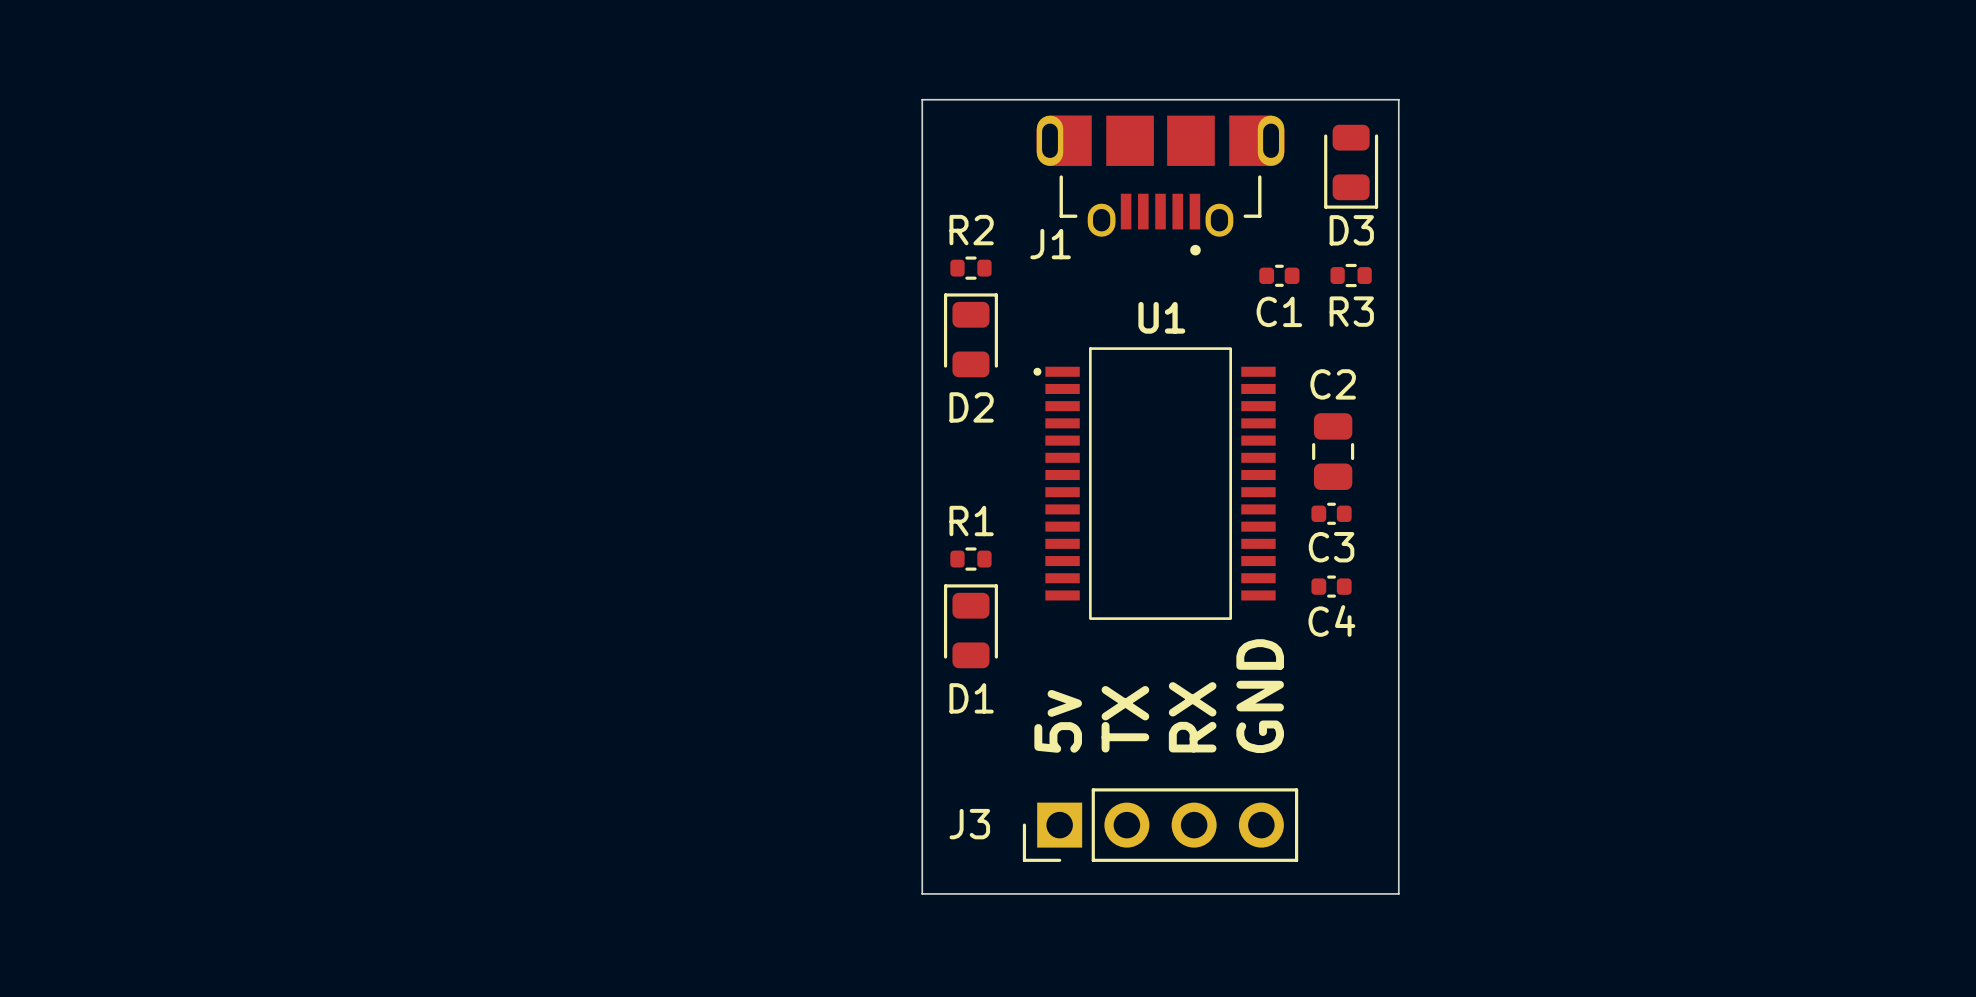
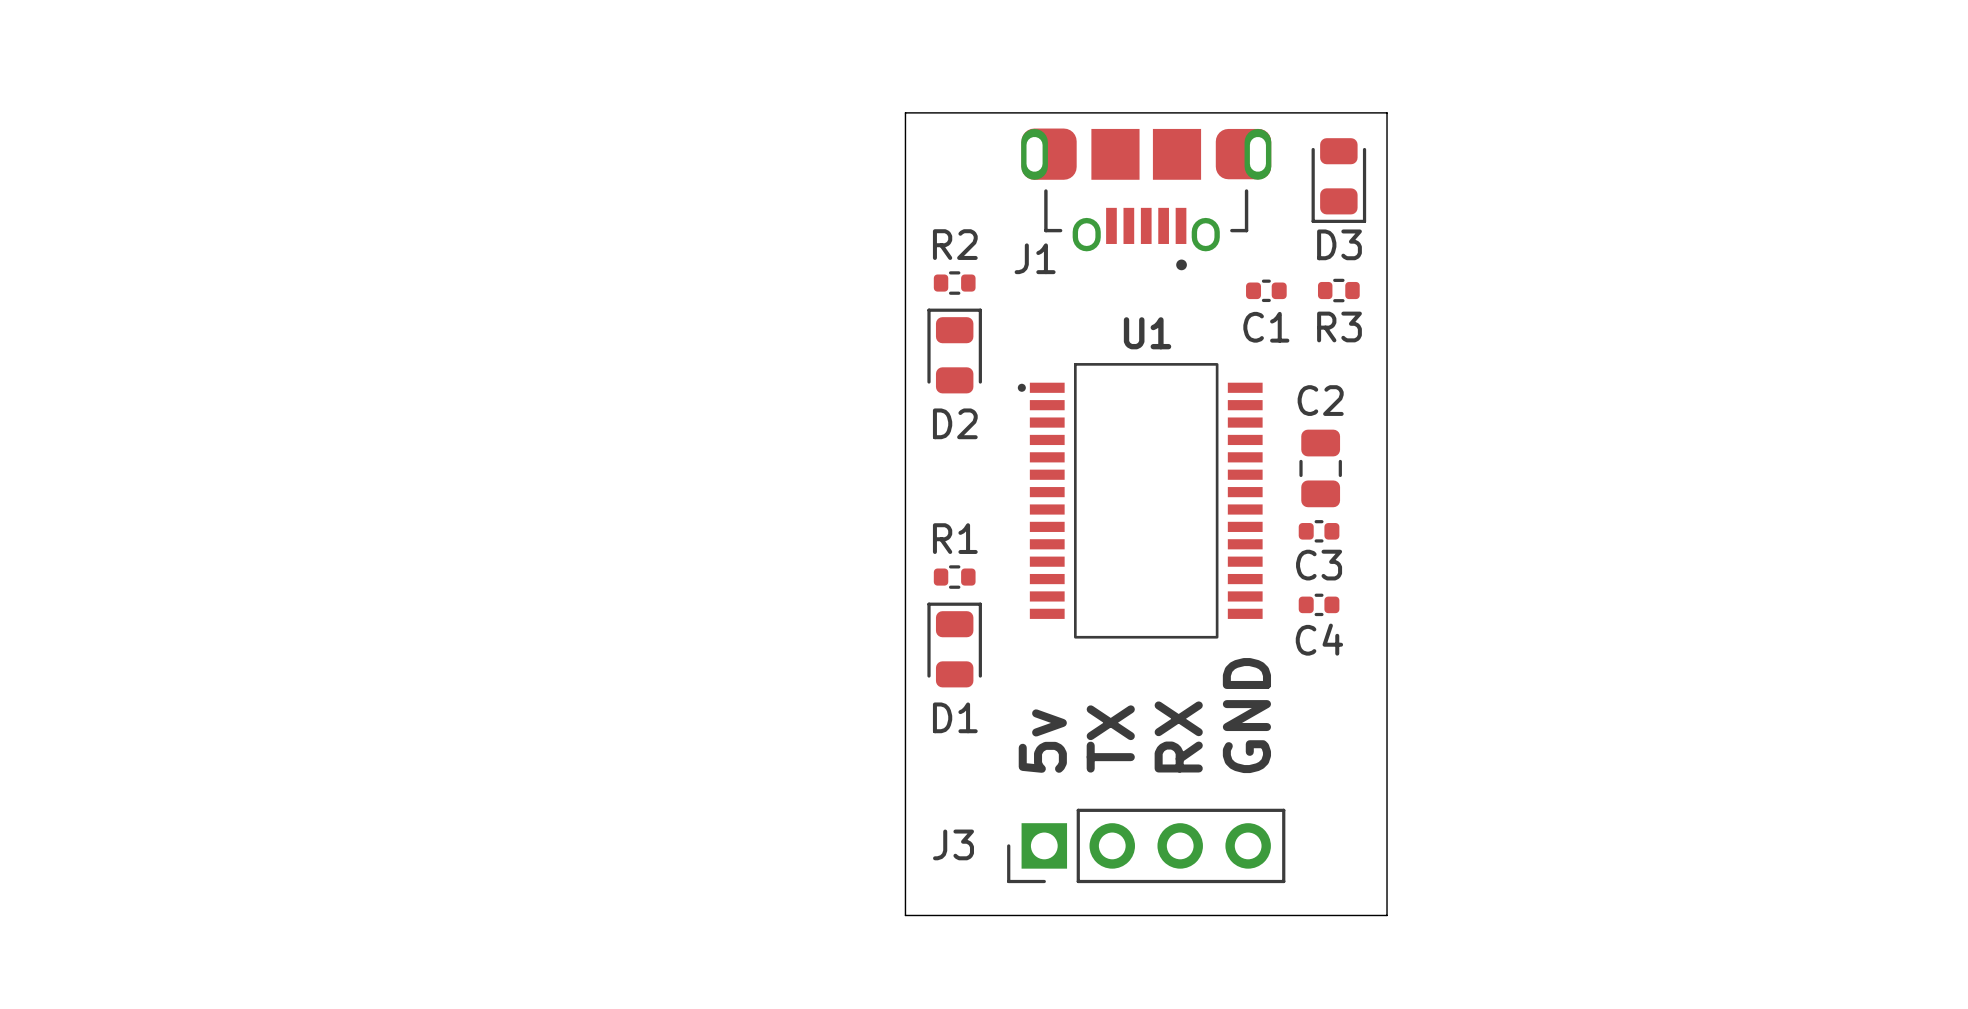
J1 footprint: [1036, 115, 1285, 256] -> [1021, 128, 1272, 271]

